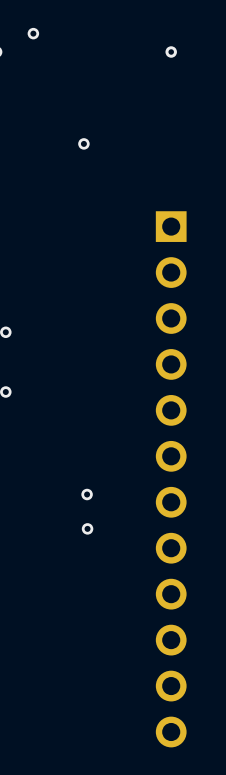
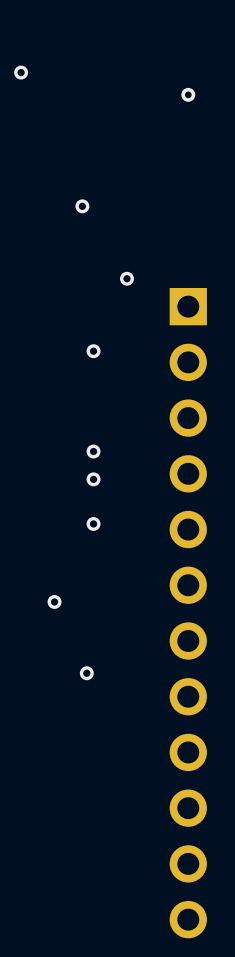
via: none -> (126, 278)
via: none -> (93, 351)
via: none -> (93, 451)
via: none -> (93, 479)
via: none -> (93, 523)
via position: (87, 494) -> (54, 601)

